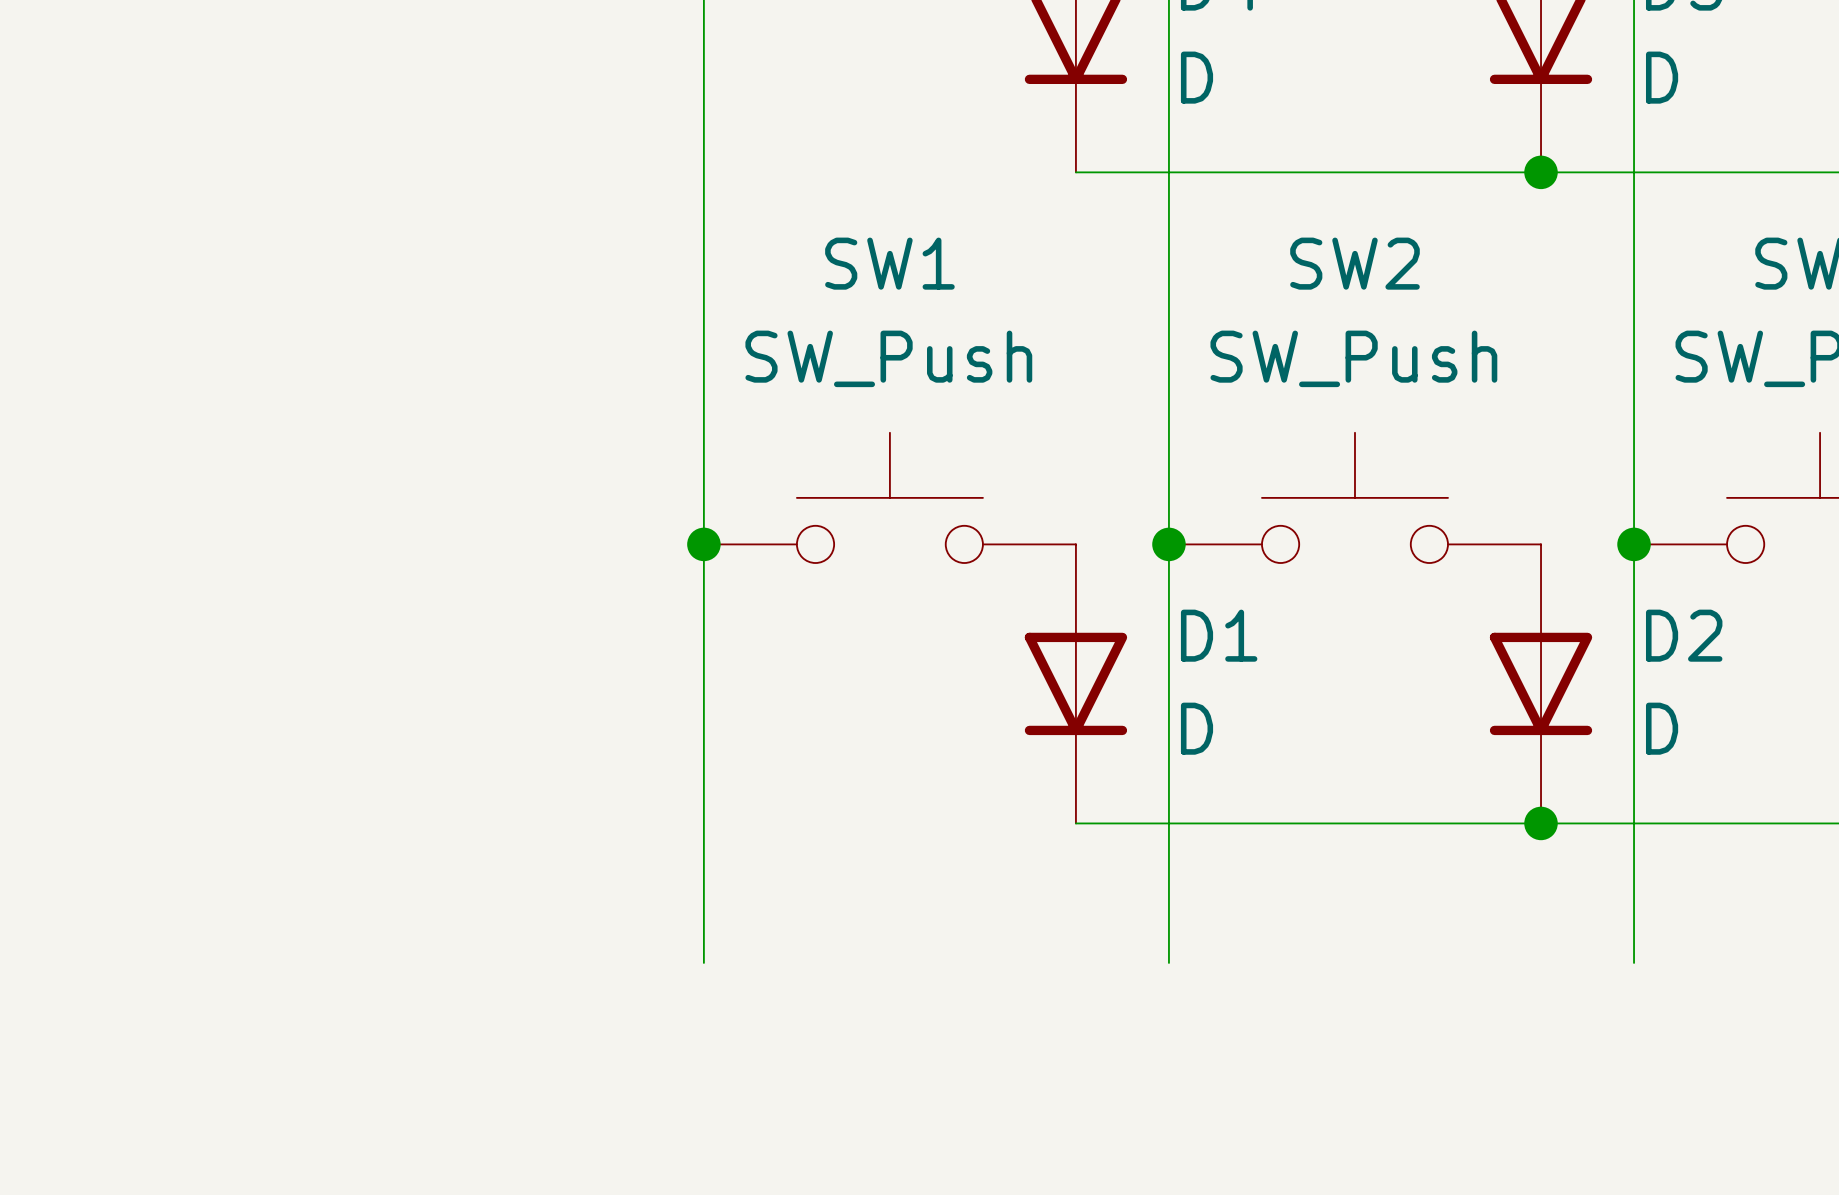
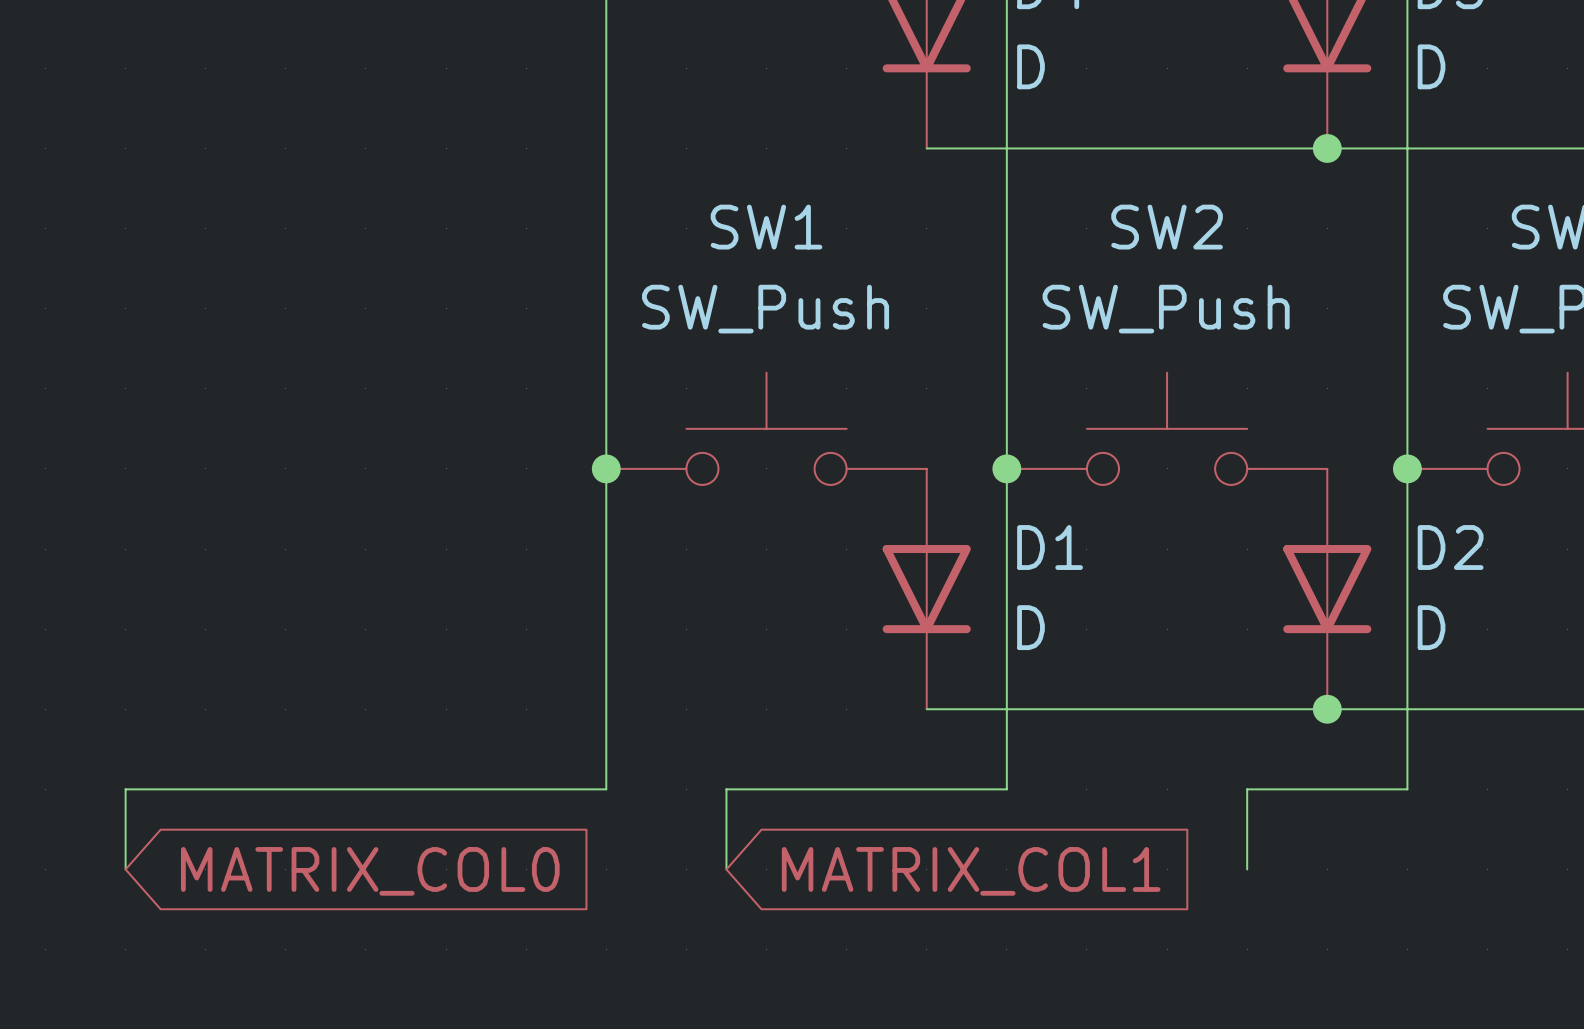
wire: (703, 916) (703, 962) -> (606, 789) (125, 789) (125, 869)
wire: (1168, 916) (1168, 962) -> (1006, 789) (726, 789) (726, 869)
wire: (1634, 916) (1634, 962) -> (1407, 789) (1247, 789) (1247, 869)
global label: none -> MATRIX_COL0 (370, 871)
global label: none -> MATRIX_COL1 (971, 871)

